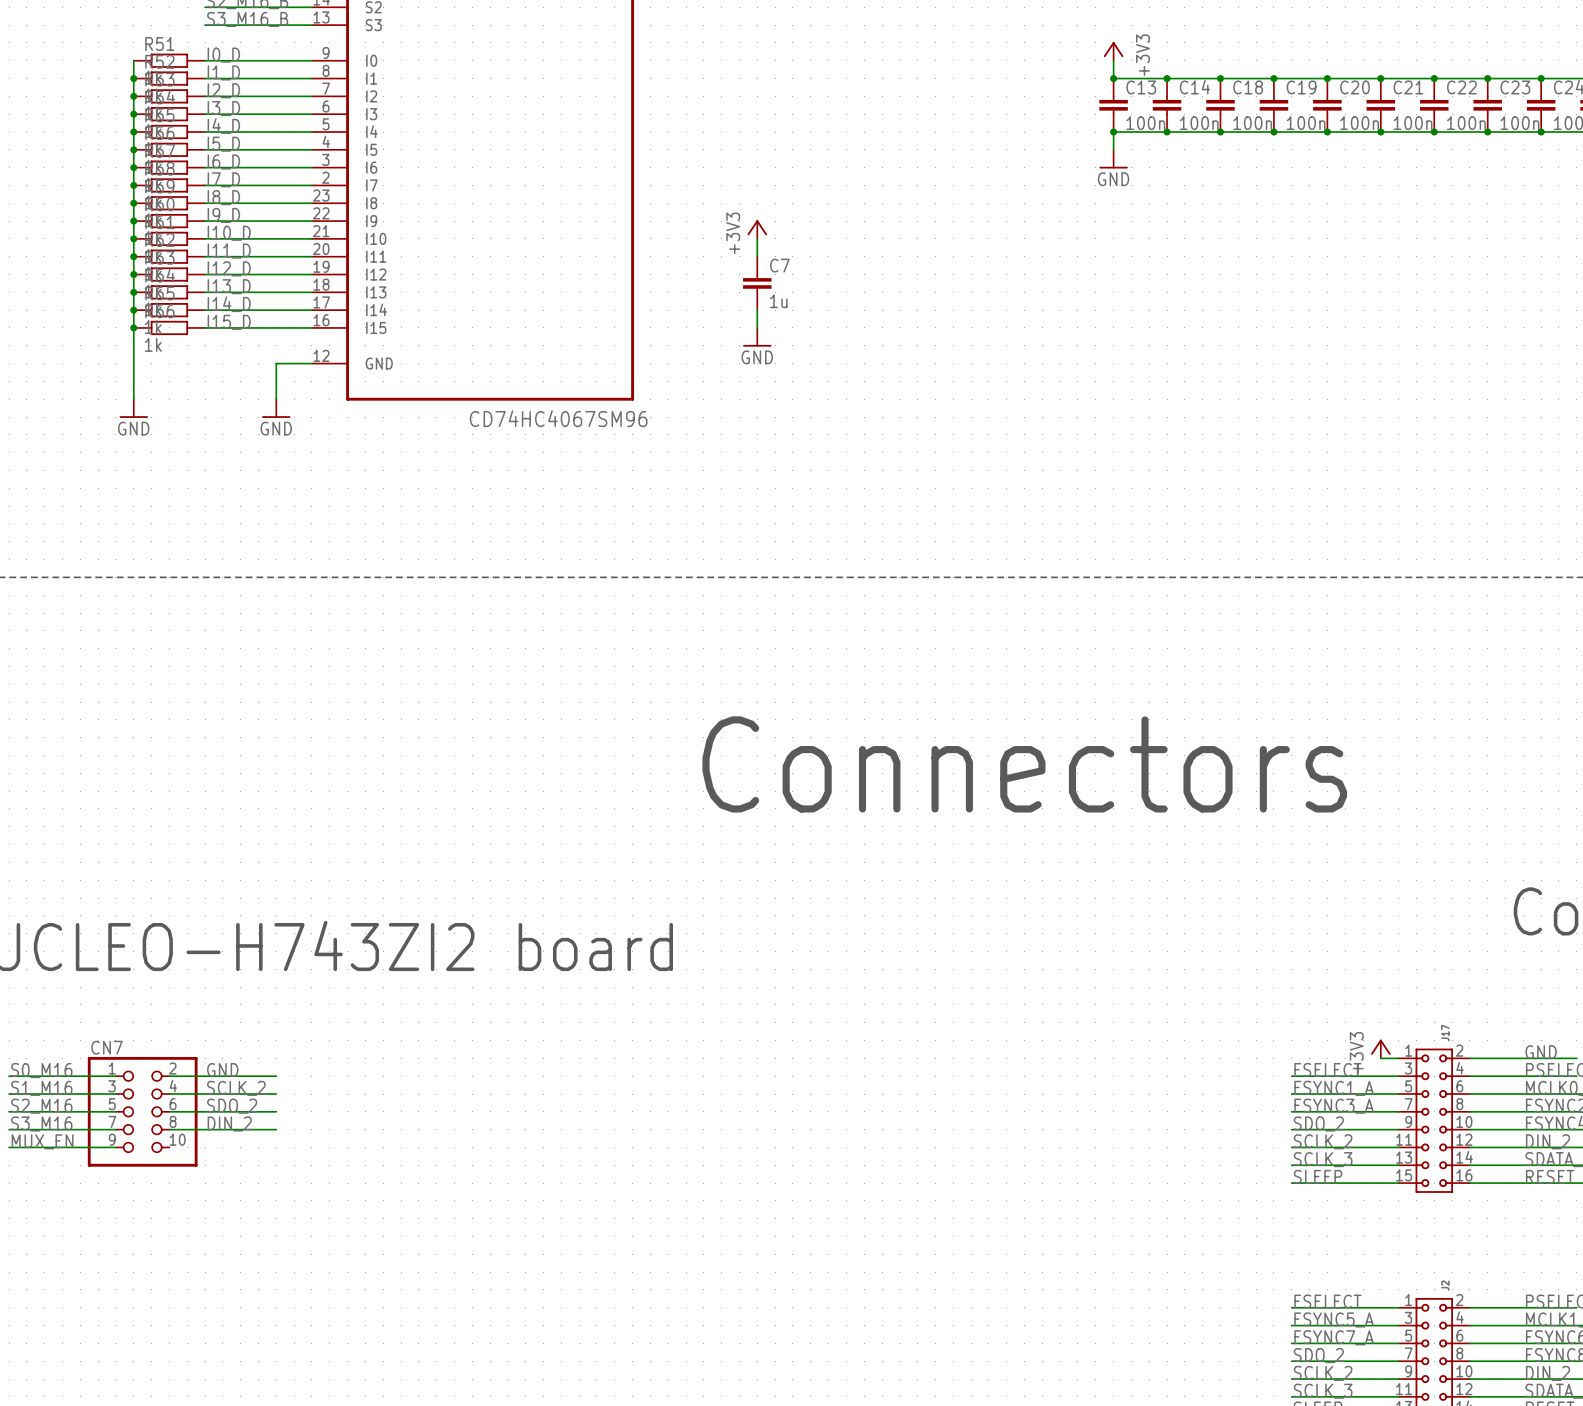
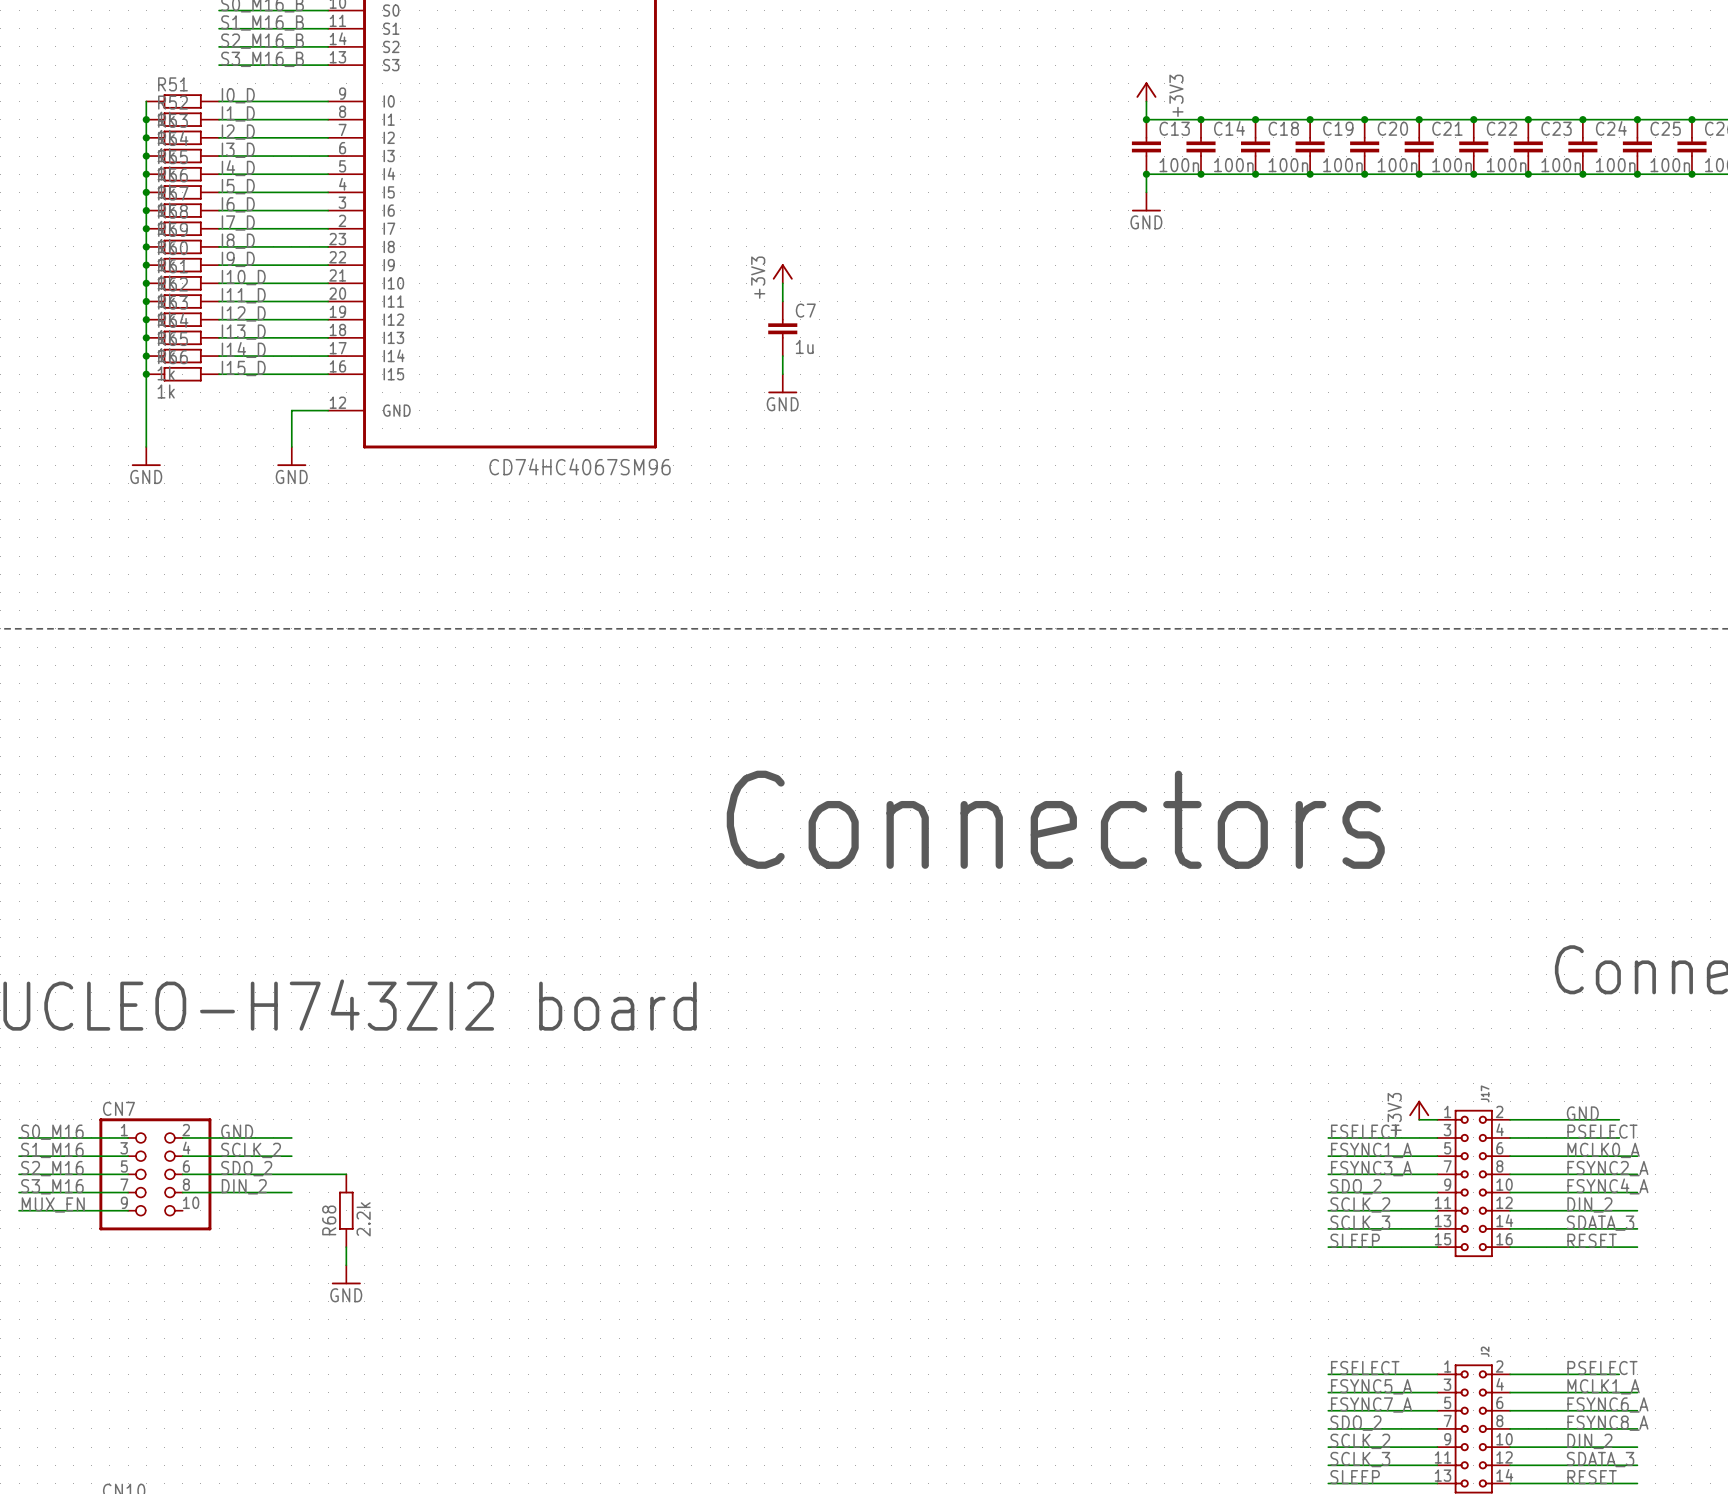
wire: none -> (291, 1174) (346, 1174)
R68: none -> 2.2k (346, 1210)
wire: none -> (346, 1247) (346, 1265)
power symbol: none -> GND (346, 1274)

